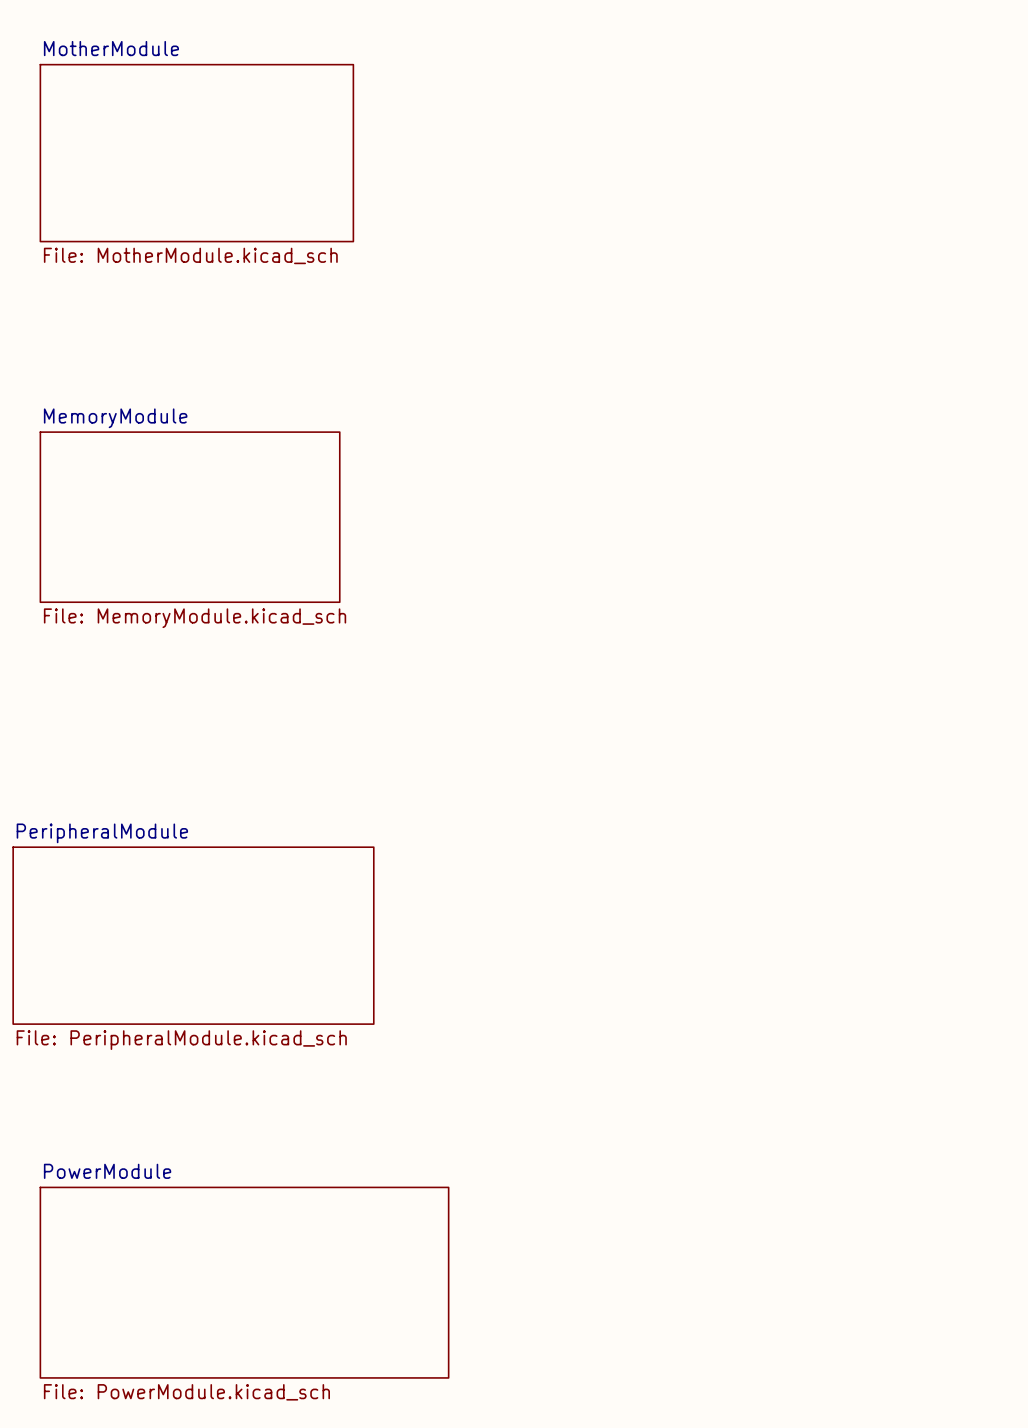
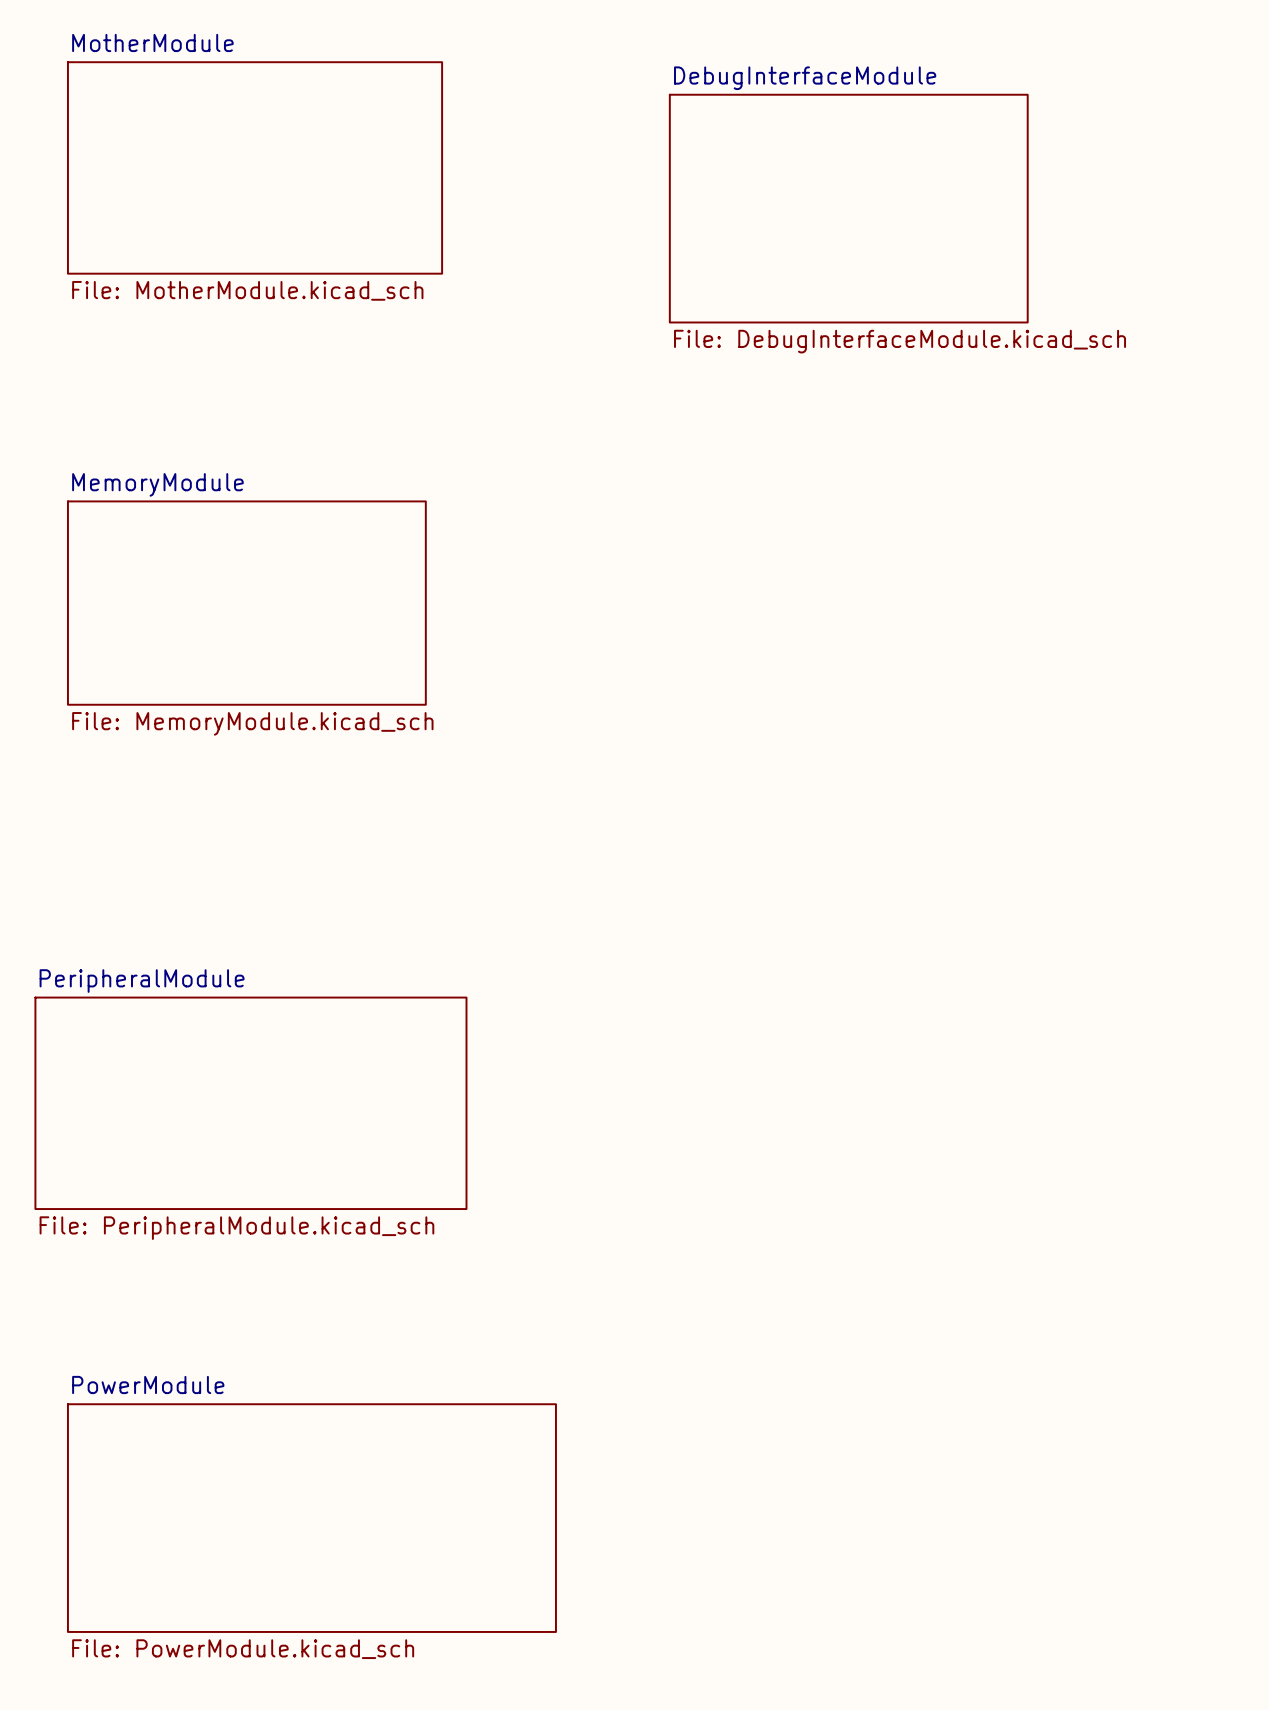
sheet DebugInterfaceModule: none -> File: DebugInterfaceModule.kicad_sch (848, 208)

